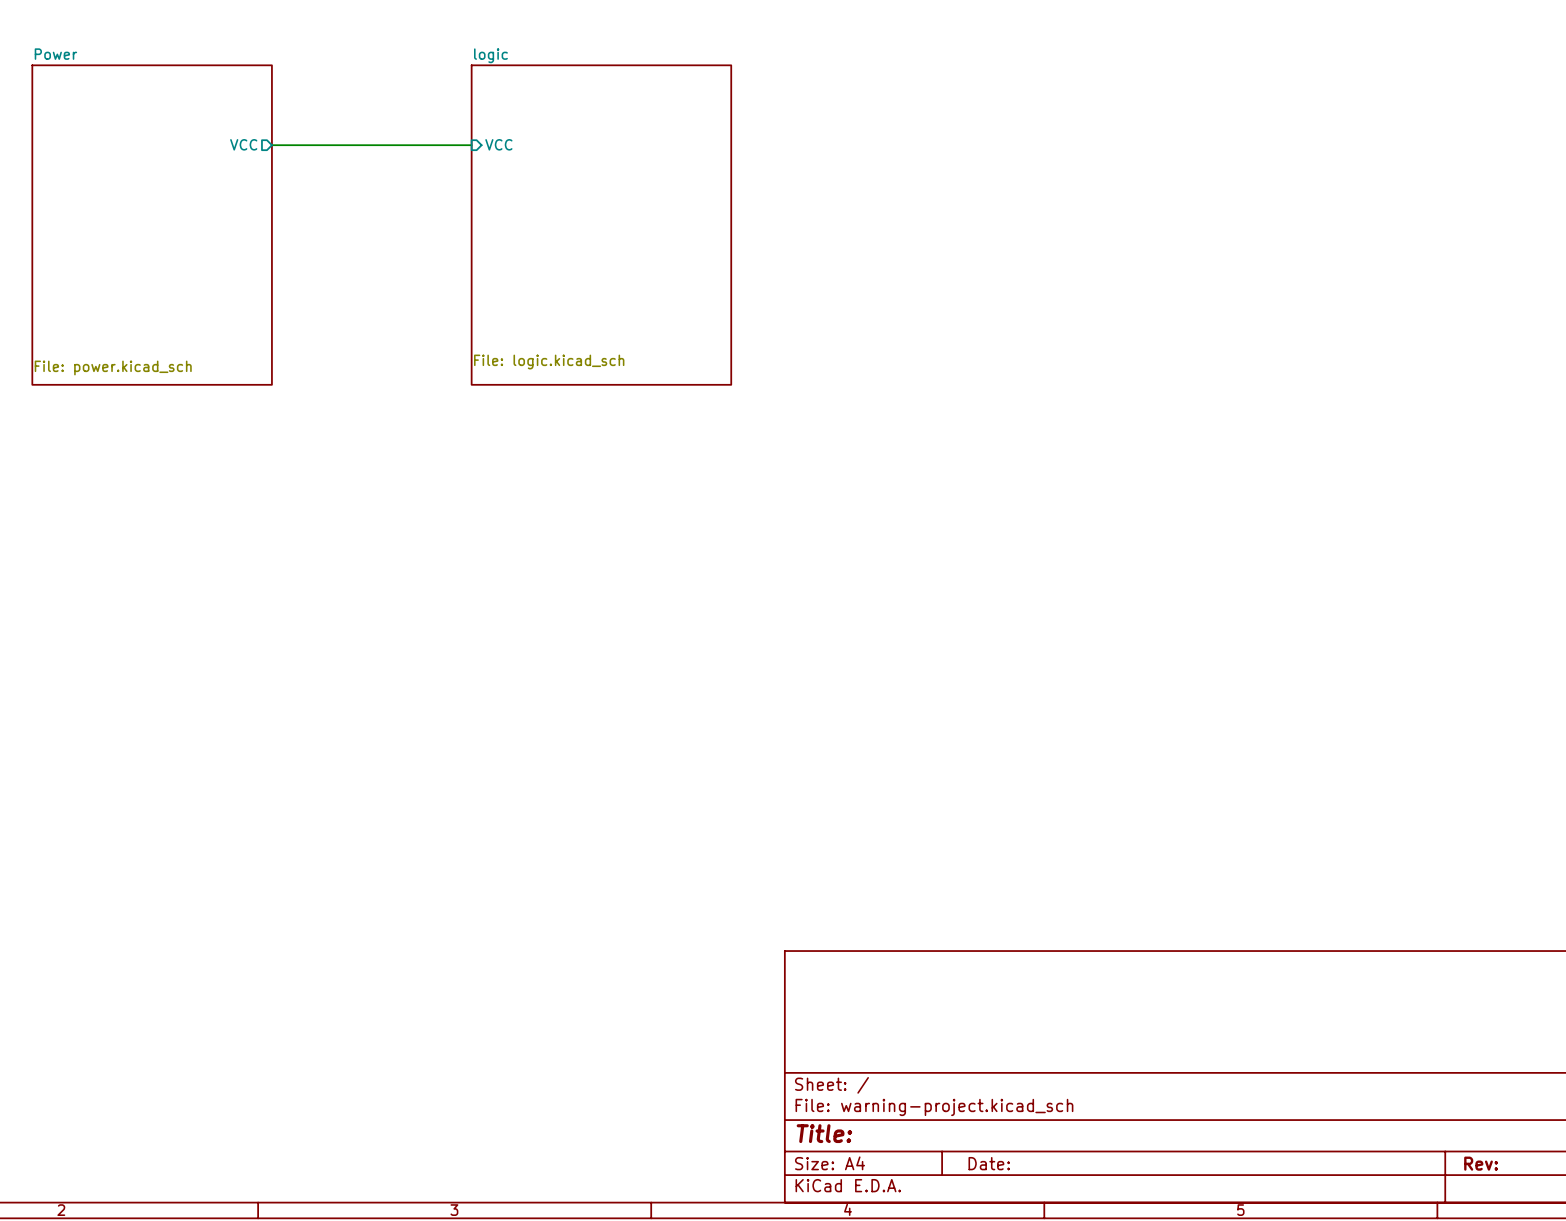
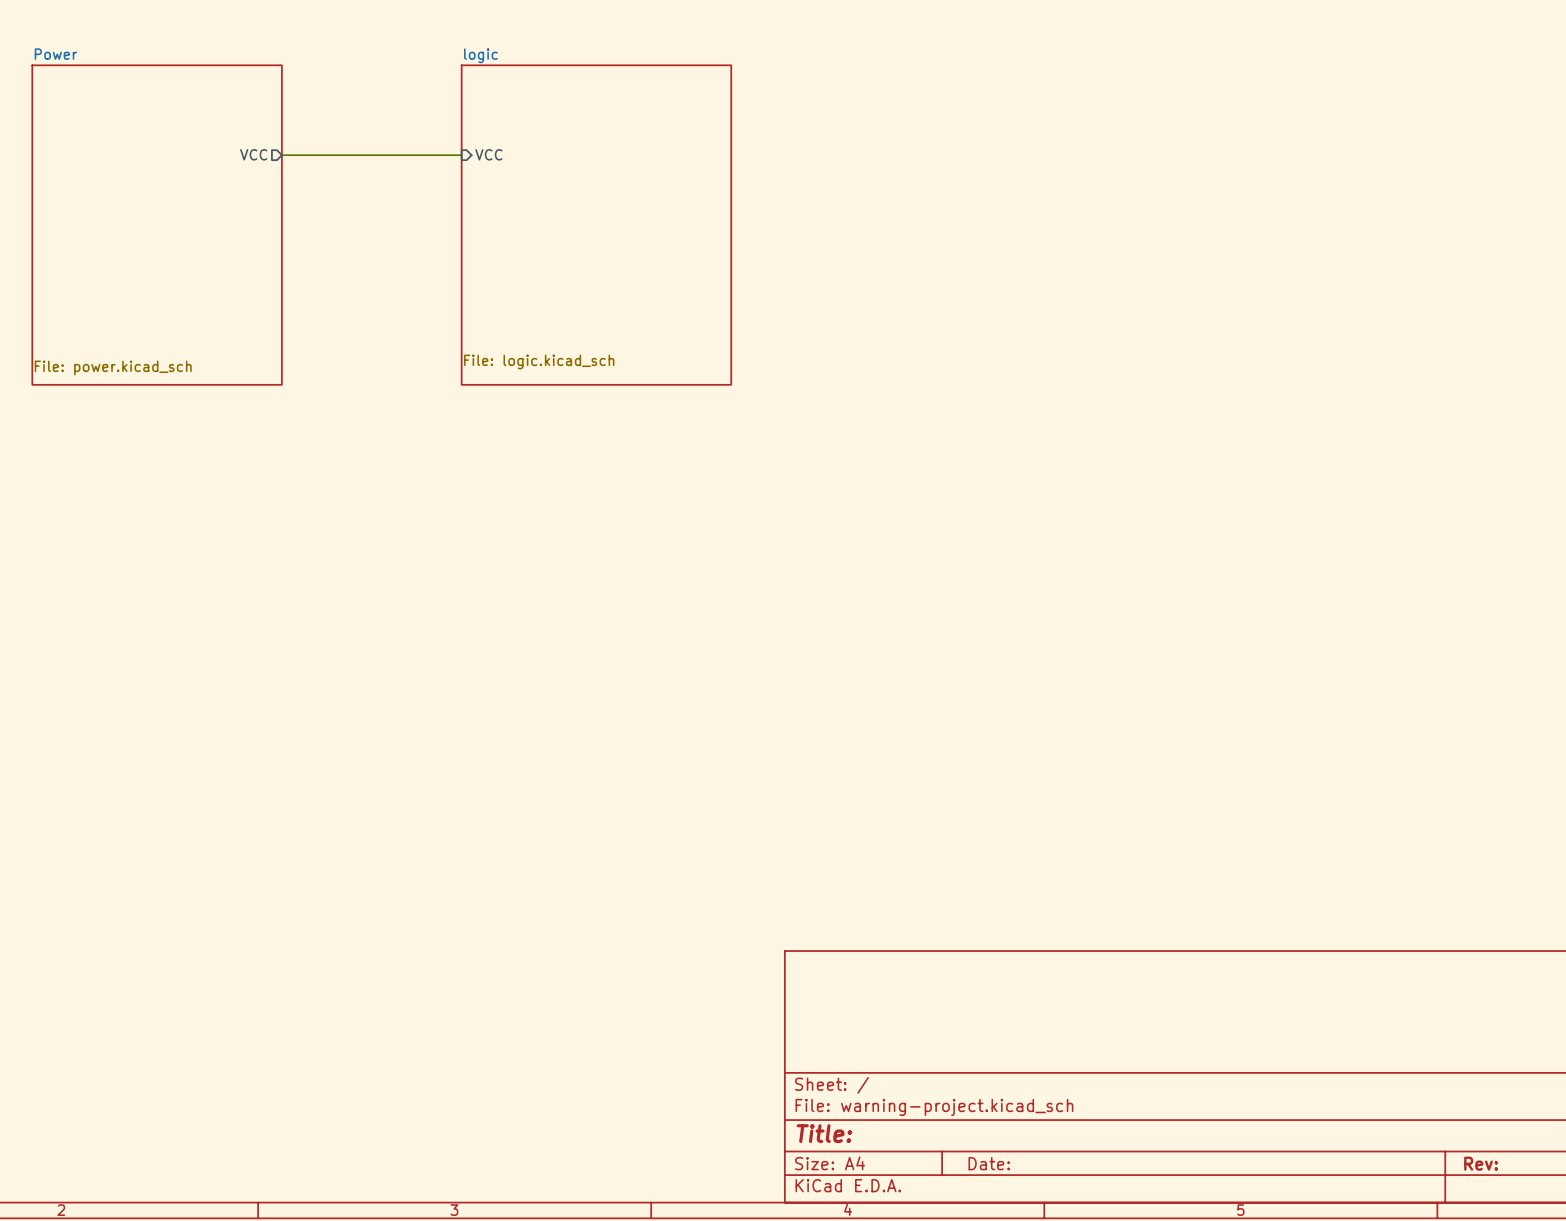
sheet Power shape: [32, 65, 272, 385] -> [32, 65, 282, 385]
sheet logic shape: [471, 65, 732, 385] -> [461, 65, 732, 385]
sheet pin position: VCC (243, 144) -> VCC (253, 154)
sheet pin position: VCC (498, 144) -> VCC (488, 154)
wire: (271, 145) (471, 145) -> none
wire: none -> (281, 155) (461, 155)

